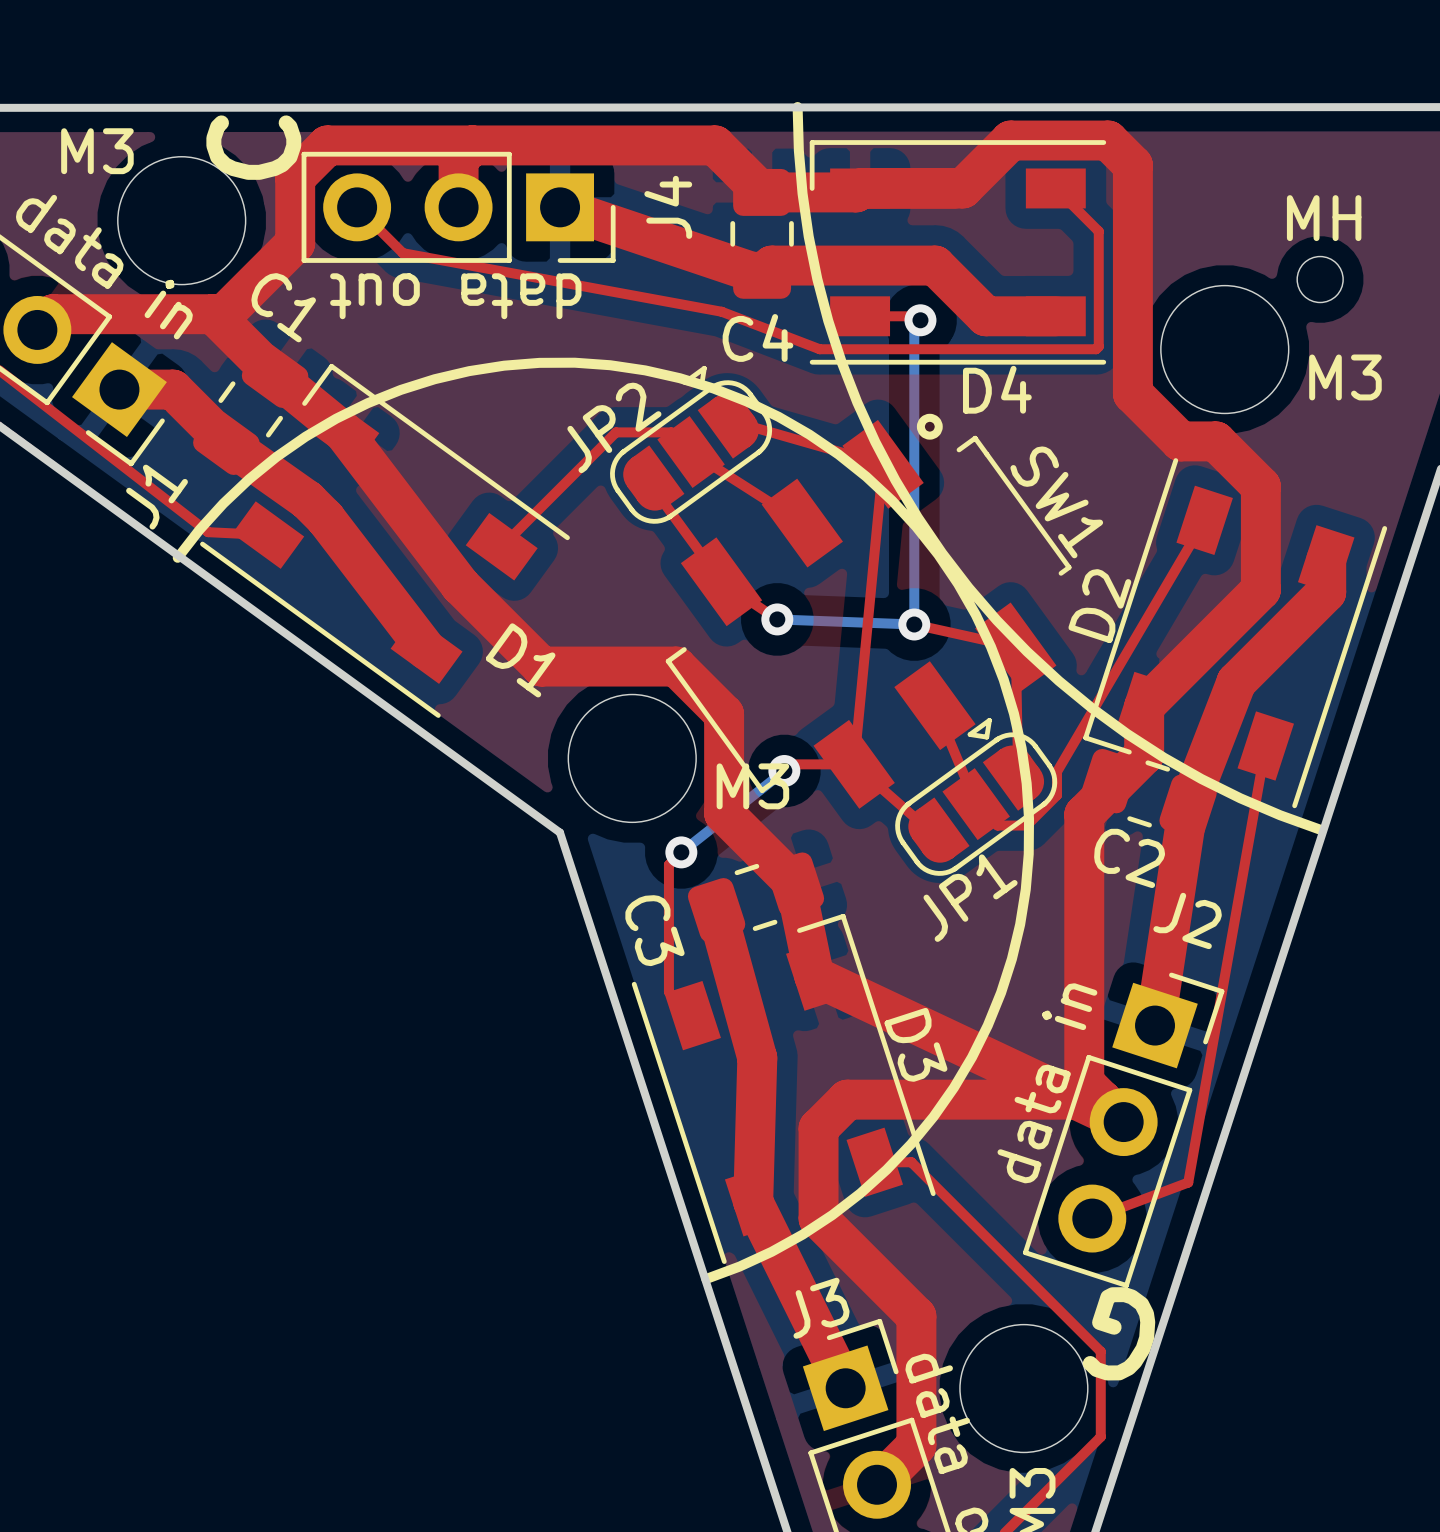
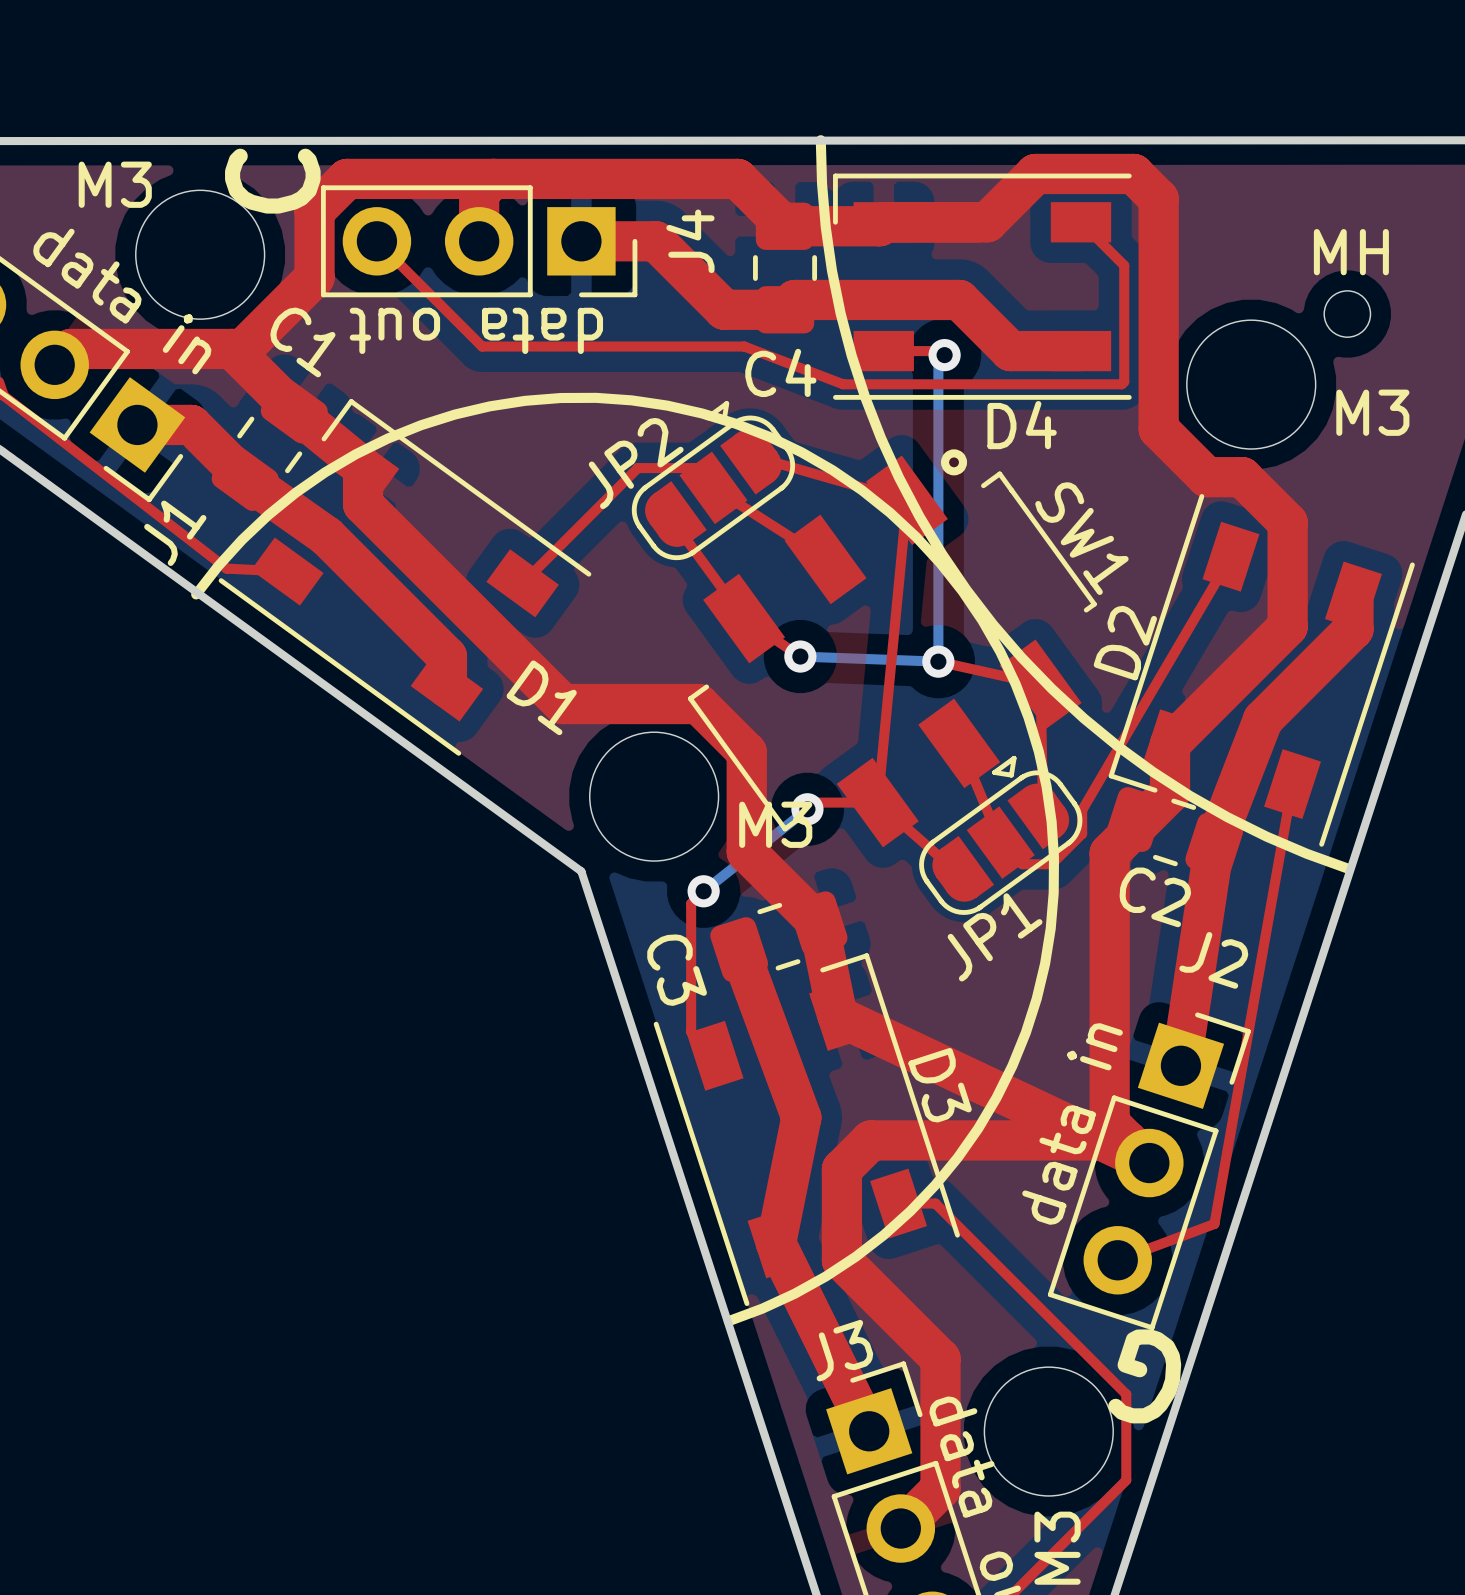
top track: (560, 207) (762, 275) -> (581, 241) (655, 241) (724, 309) (785, 309)
top track: (402, 253) (721, 311) -> (423, 287) (482, 346) (744, 346)
top track: (343, 431) (460, 585) -> (363, 467) (363, 504) (480, 622)
top track: (325, 518) (426, 650) -> (345, 554) (446, 656) (446, 687)
top track: (716, 910) (757, 1058) (753, 1201) -> (739, 949) (801, 1117) (776, 1243)

